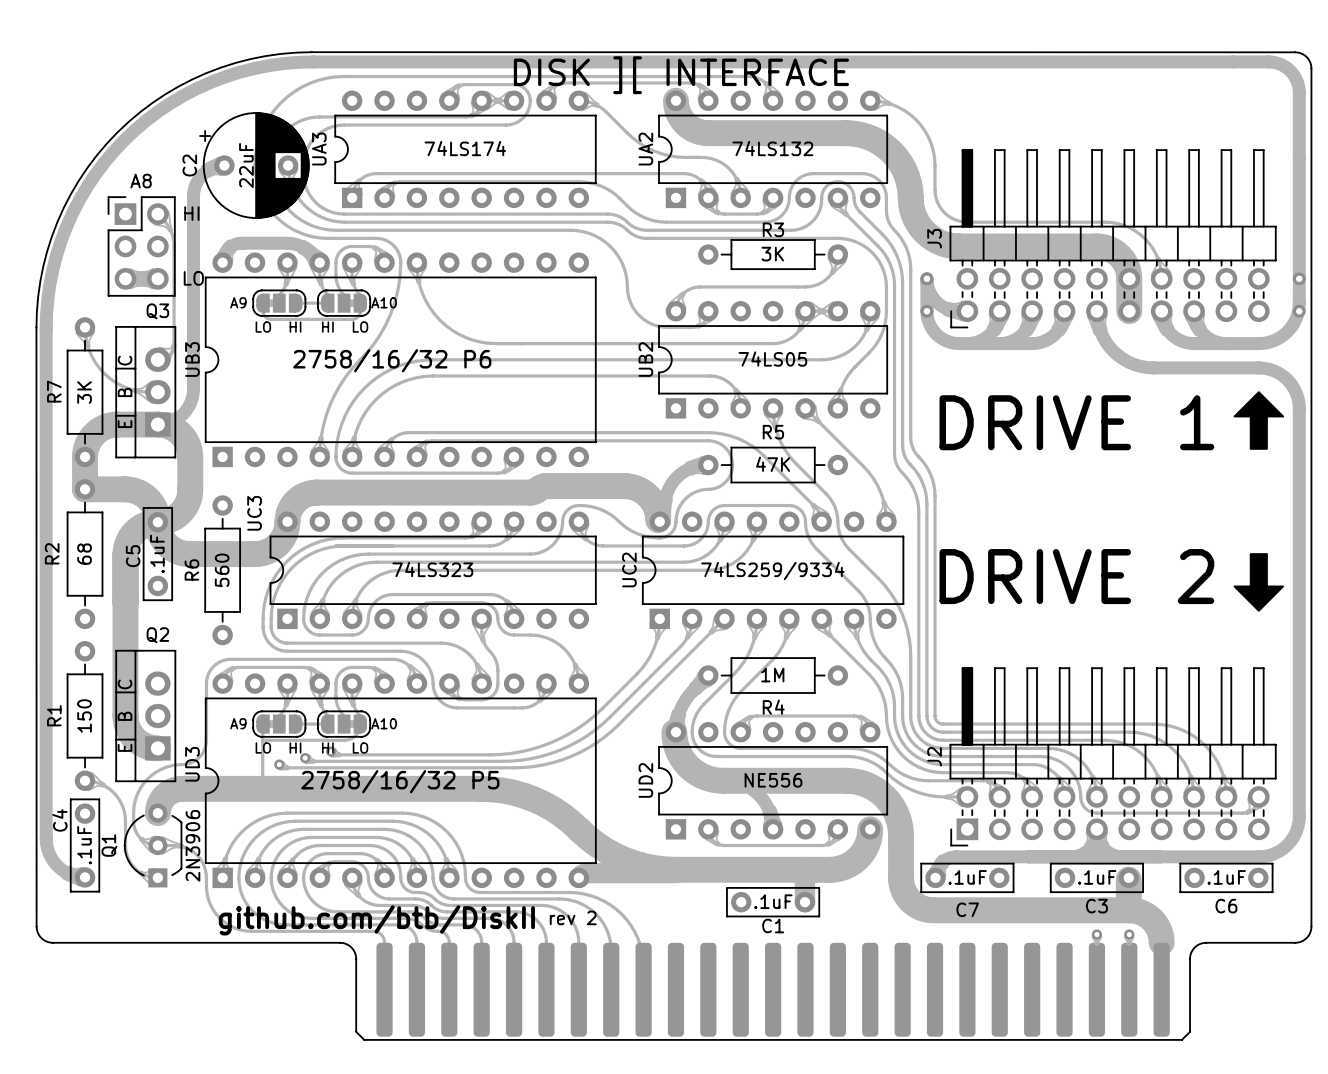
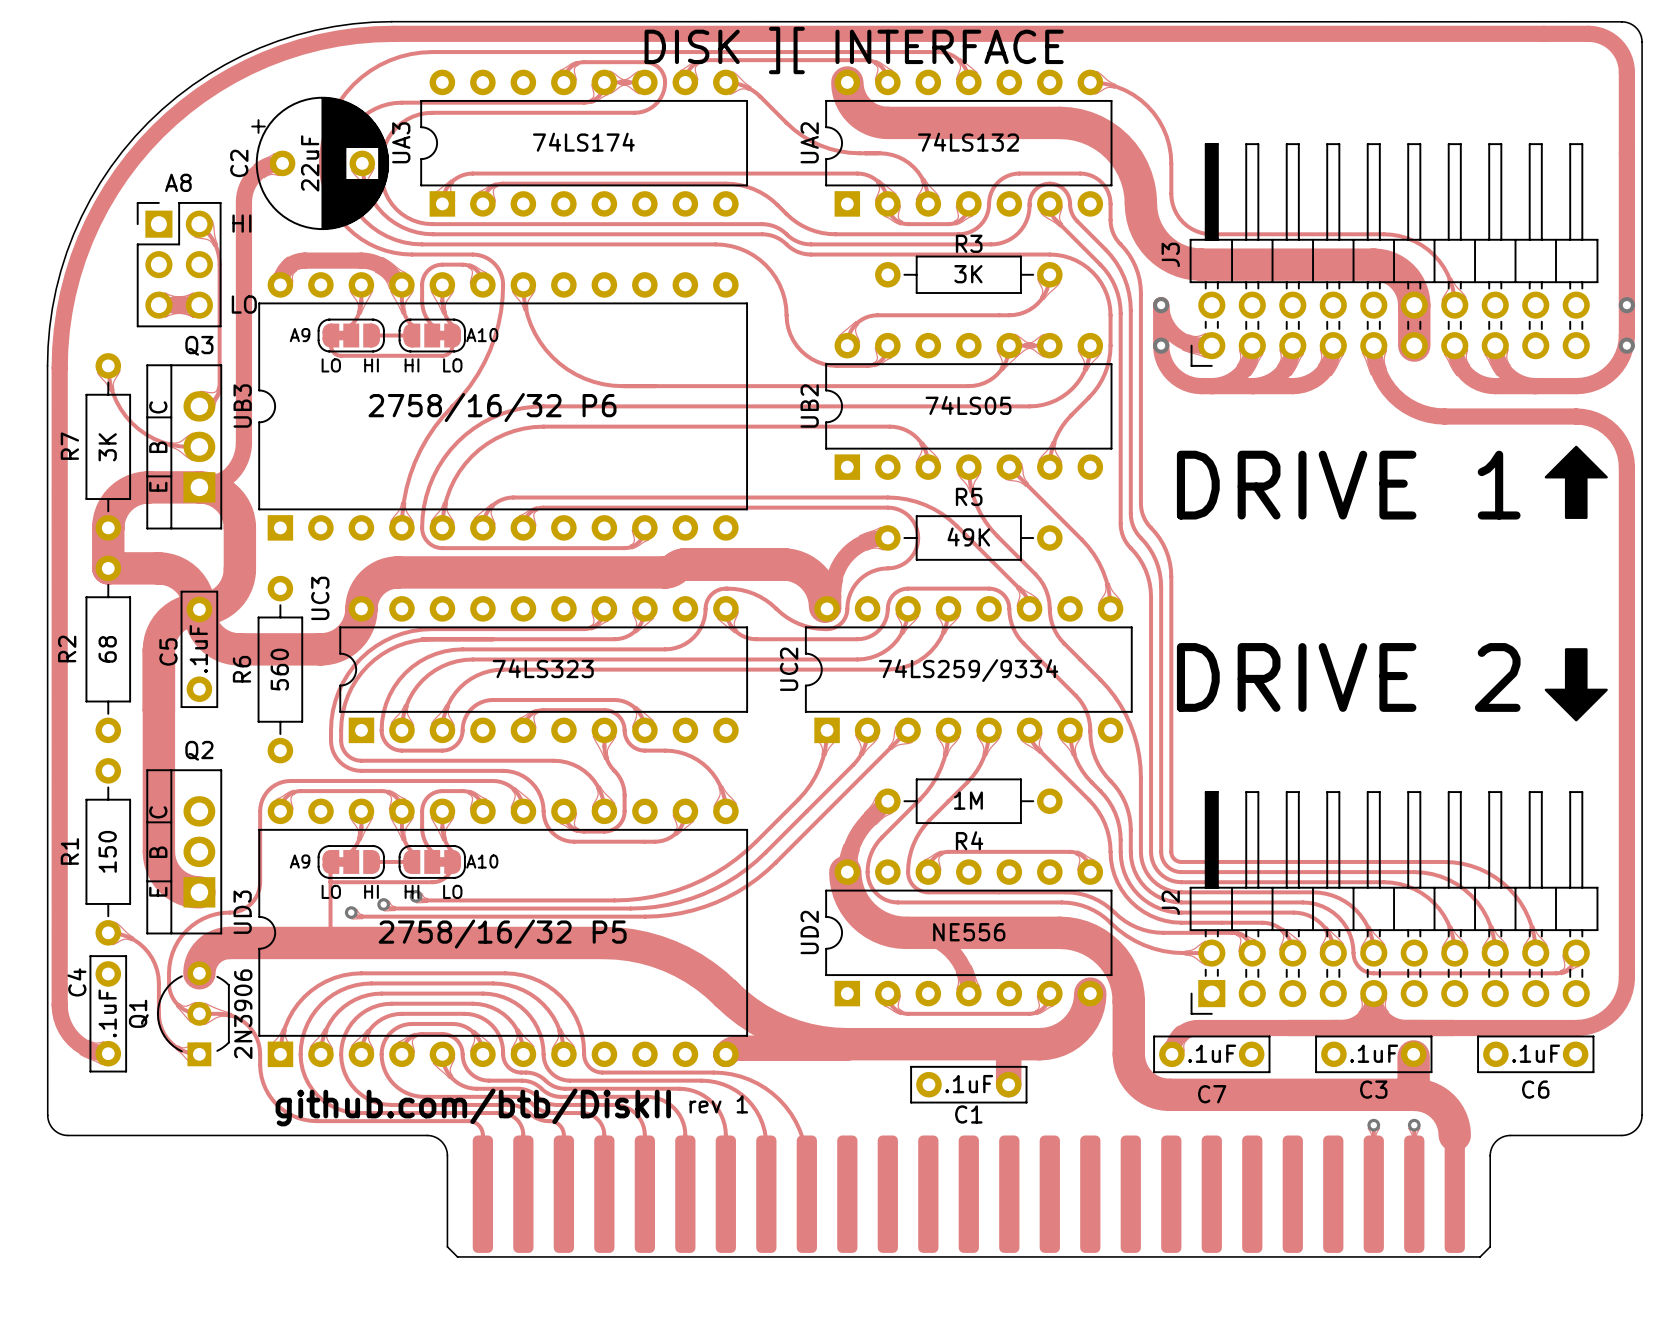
R5 value: 47K (773, 464) -> 49K (968, 537)
text: rev 2 (573, 917) -> rev 1 (718, 1104)

